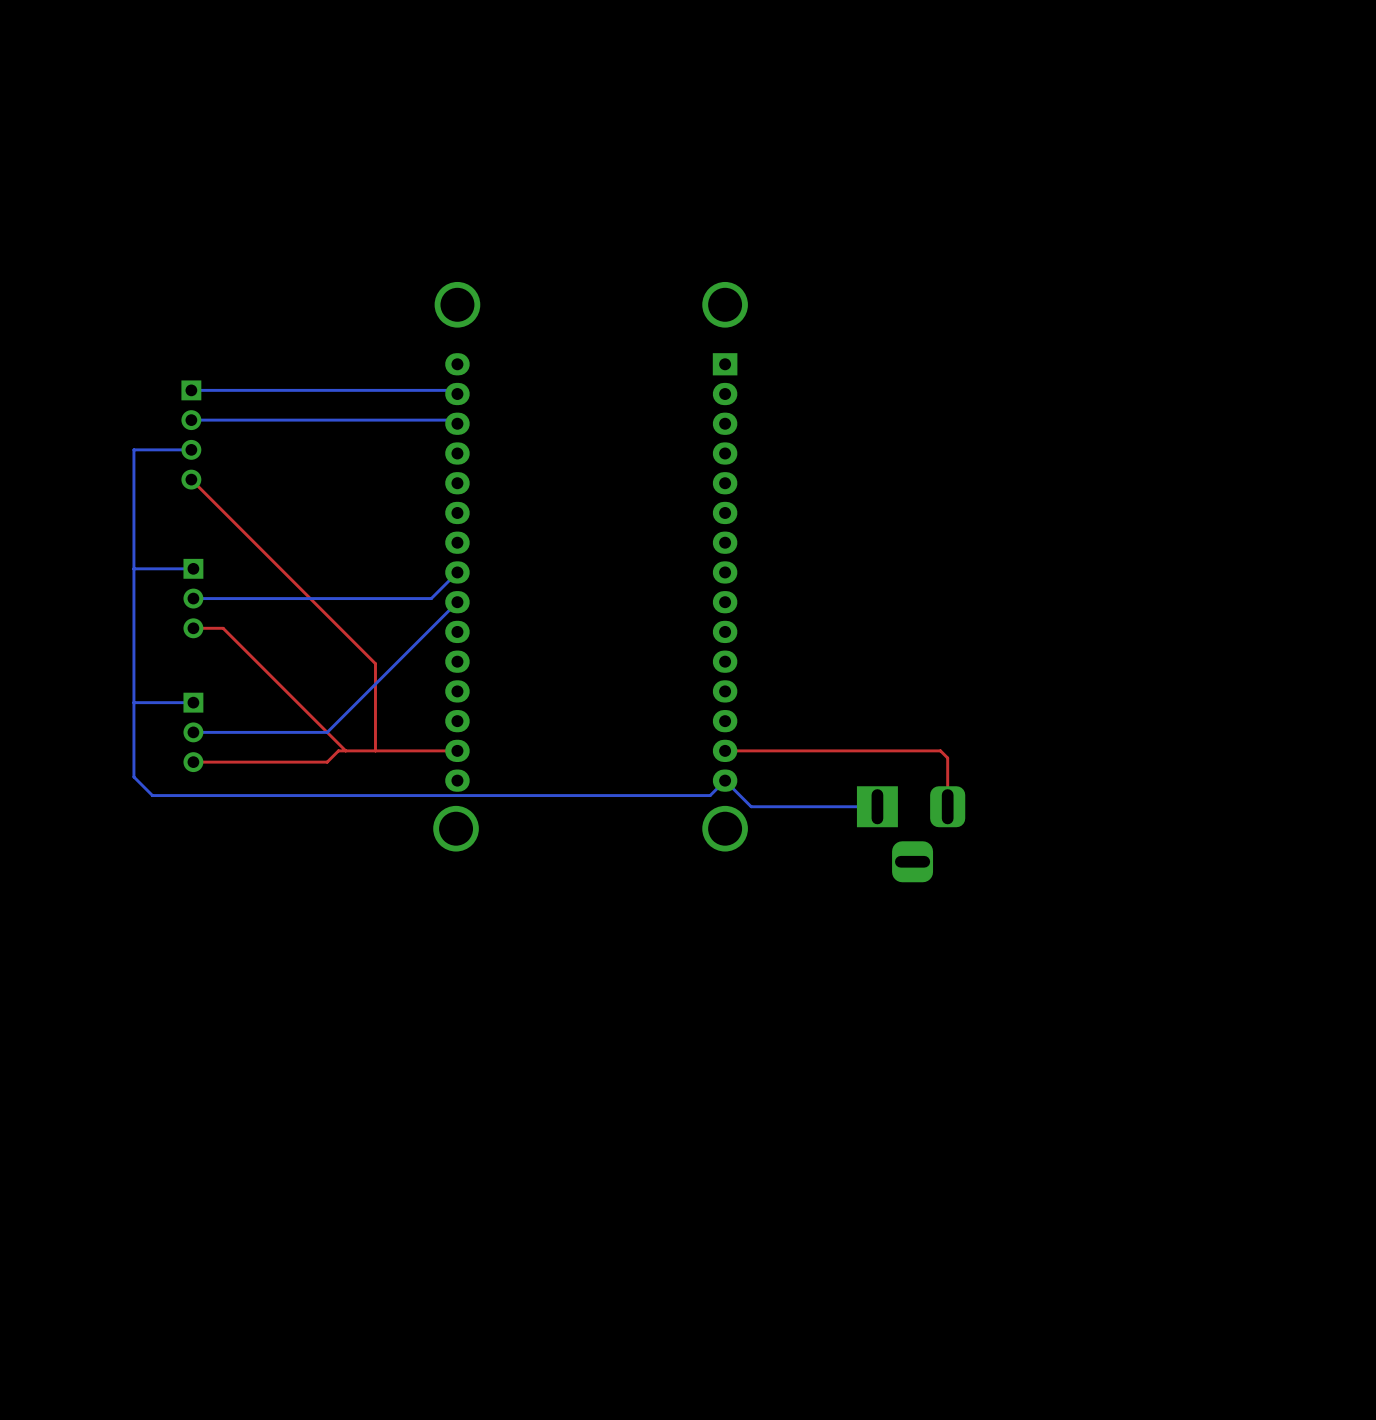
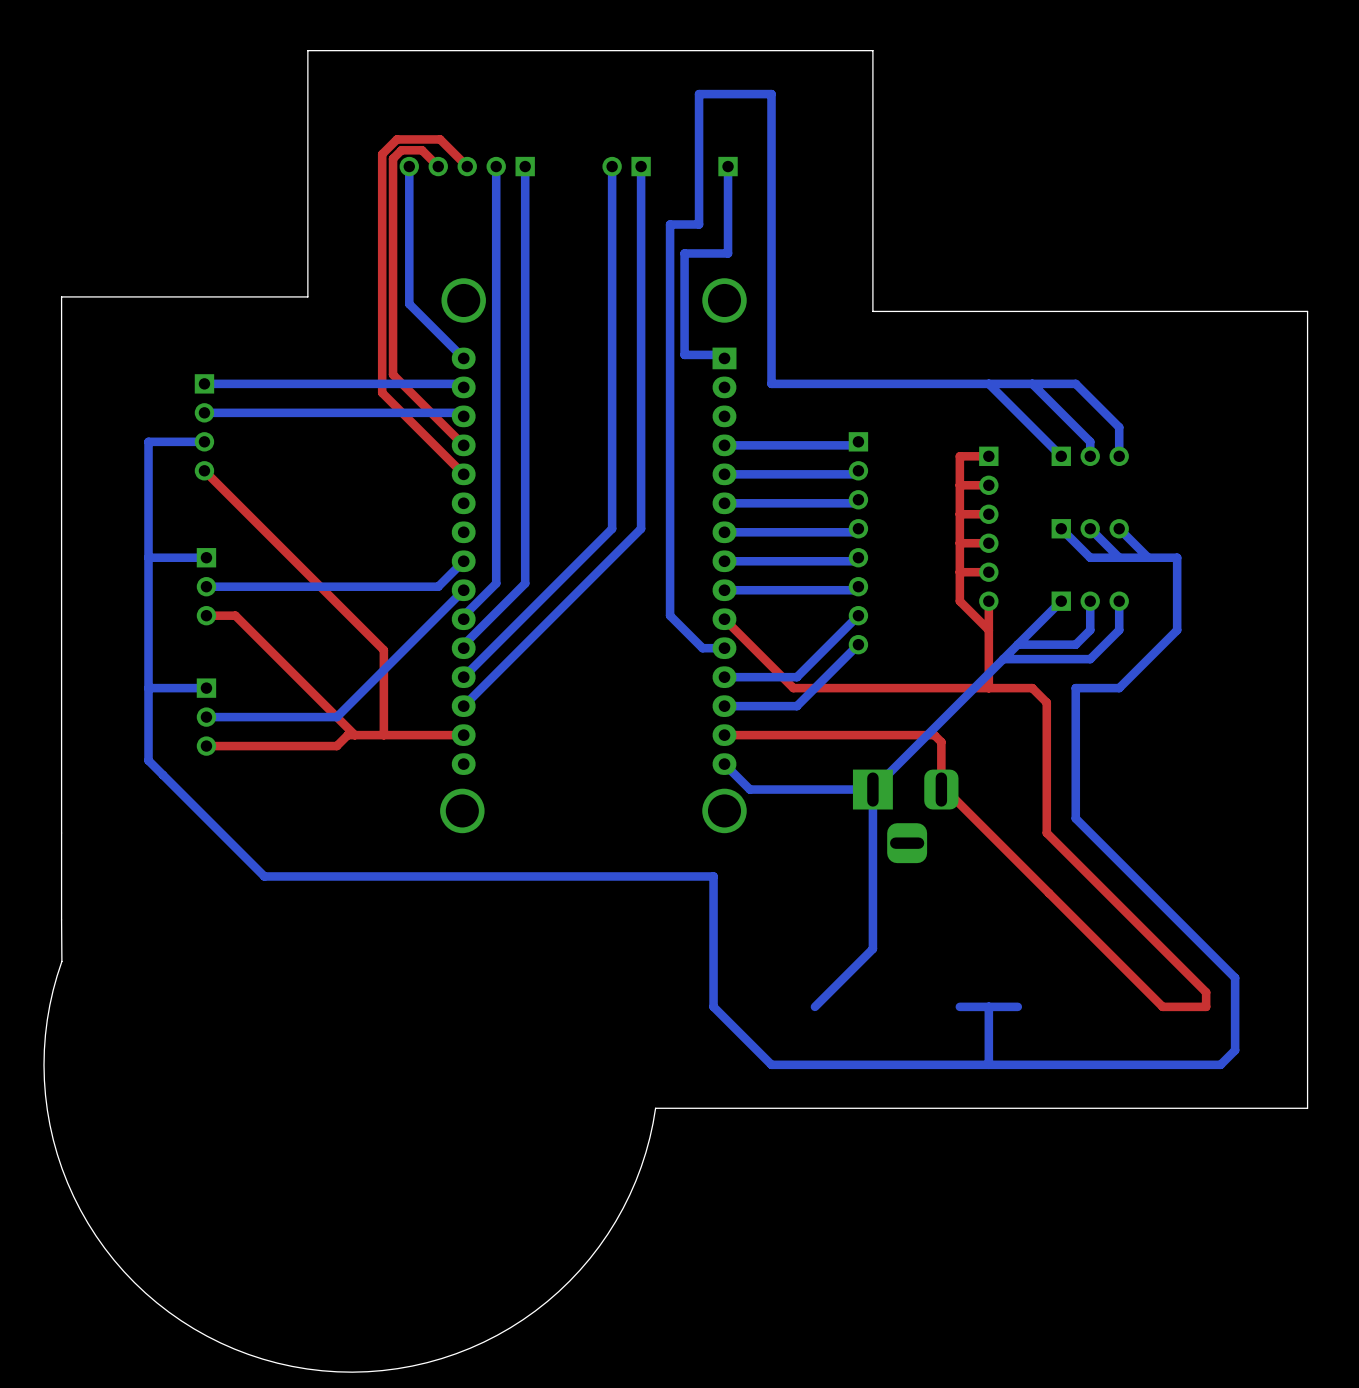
board edge: none -> (872, 50) (307, 50) (307, 296) (61, 296) (61, 961) (49, 1005) (45, 1034) (44, 1065) (47, 1110) (57, 1154) (67, 1182) (80, 1210) (104, 1248) (134, 1282) (156, 1302) (207, 1336) (234, 1349) (277, 1363) (337, 1371) (367, 1371) (412, 1366) (441, 1358) (483, 1342) (510, 1327) (547, 1301) (580, 1270) (599, 1246) (623, 1208) (635, 1181) (649, 1137) (655, 1108) (1307, 1108) (1307, 311) (872, 311) (872, 50)
bottom track: none -> (409, 166) (409, 304) (463, 358)
top track: none -> (438, 166) (422, 150) (401, 150) (393, 158) (393, 374) (463, 445)
top track: none -> (467, 166) (440, 139) (397, 139) (382, 154) (382, 392) (463, 474)
part: none -> (467, 166)
bottom track: none -> (496, 166) (496, 583) (463, 615) (463, 619)
bottom track: none -> (525, 166) (525, 583) (463, 644) (463, 648)
bottom track: none -> (612, 166) (612, 528) (463, 677)
part: none -> (626, 166)
bottom track: none -> (641, 166) (641, 528) (463, 706)
bottom track: none -> (728, 166) (728, 253) (684, 253) (684, 354) (720, 354) (724, 358)
part: none -> (728, 166)
bottom track width: thin (453, 390) (191, 390) -> thick (460, 383) (204, 383)
bottom track: none -> (988, 383) (1061, 456)
bottom track: none -> (1032, 383) (1090, 441) (1090, 456)
bottom track width: thin (453, 420) (191, 420) -> thick (460, 412) (204, 412)
bottom track width: thin (191, 449) (133, 449) (133, 777) (148, 791) -> thick (204, 441) (148, 441) (148, 760) (162, 775)
bottom track: none -> (858, 441) (854, 445) (724, 445)
top track: none -> (988, 456) (959, 456) (959, 601) (988, 630)
part: none -> (1090, 456)
bottom track: none -> (1119, 456) (1119, 427) (1075, 383) (771, 383) (771, 94) (699, 94) (699, 224) (670, 224) (670, 615) (702, 648) (724, 648)
top track width: thin (191, 479) (375, 663) (375, 750) -> thick (204, 470) (383, 650) (383, 735)
bottom track: none -> (858, 470) (854, 474) (724, 474)
top track: none -> (988, 485) (959, 485)
bottom track: none -> (858, 499) (854, 503) (724, 503)
top track: none -> (988, 514) (959, 514)
bottom track: none -> (858, 528) (854, 532) (724, 532)
part: none -> (988, 528)
bottom track: none -> (1061, 528) (1090, 557) (1177, 557) (1177, 630) (1119, 688) (1075, 688) (1075, 818) (1235, 977) (1235, 1050) (1220, 1064) (771, 1064) (713, 1006) (713, 876) (264, 876) (162, 775)
bottom track: none -> (1090, 528) (1119, 557)
part: none -> (1090, 528)
bottom track: none -> (1119, 528) (1148, 557)
part: none -> (858, 543)
top track: none -> (988, 543) (959, 543)
bottom track width: thin (193, 568) (133, 568) -> thick (206, 557) (148, 557)
bottom track: none -> (858, 557) (854, 561) (724, 561)
bottom track width: thin (457, 572) (431, 598) (193, 598) -> thick (463, 561) (438, 586) (206, 586)
top track: none -> (988, 572) (959, 572)
bottom track: none -> (858, 586) (854, 590) (724, 590)
bottom track width: thin (457, 602) (327, 732) (193, 732) -> thick (463, 590) (336, 717) (206, 717)
top track: none -> (988, 601) (988, 688)
bottom track: none -> (1061, 601) (872, 789) (872, 948) (814, 1006)
bottom track: none -> (1090, 601) (1090, 630) (1075, 644) (1017, 644)
part: none -> (1090, 601)
bottom track: none -> (1119, 601) (1119, 630) (1090, 659) (1003, 659)
top track width: thin (193, 628) (223, 628) (345, 750) -> thick (206, 615) (235, 615) (354, 735)
bottom track: none -> (858, 615) (796, 677) (724, 677)
top track: none -> (724, 619) (793, 688) (1032, 688) (1046, 702) (1046, 833) (1206, 992) (1206, 1006) (1162, 1006) (945, 789) (941, 789)
bottom track: none -> (858, 644) (796, 706) (724, 706)
bottom track width: thin (193, 702) (133, 702) -> thick (206, 688) (148, 688)
top track width: thin (457, 750) (338, 750) (327, 762) (193, 762) -> thick (463, 735) (347, 735) (336, 746) (206, 746)
top track width: thin (725, 750) (940, 750) (947, 758) (947, 806) -> thick (724, 735) (934, 735) (941, 742) (941, 789)
bottom track: (725, 780) (710, 795) (152, 795) -> none
bottom track width: thin (725, 780) (751, 806) (877, 806) -> thick (724, 764) (749, 789) (872, 789)
bottom track: none -> (988, 1006) (988, 1064)
bottom track: none -> (1017, 1006) (959, 1006)

